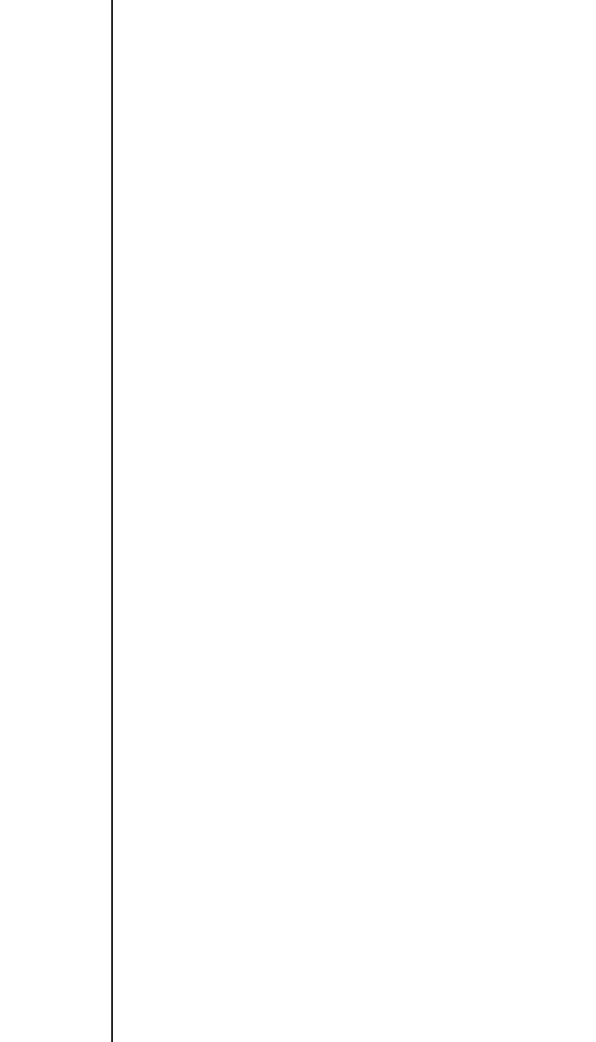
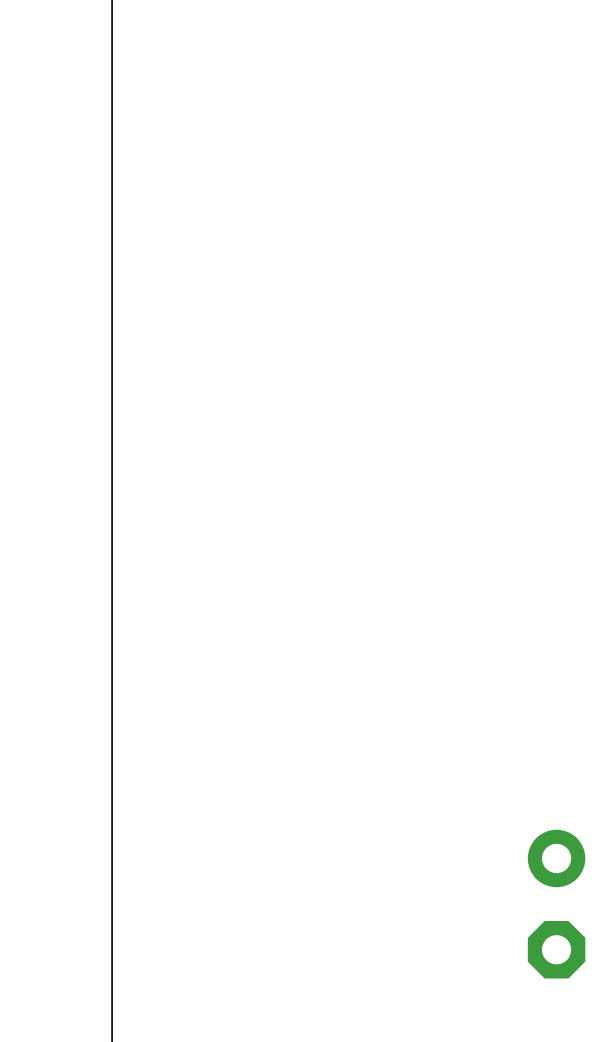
part: none -> (556, 904)

